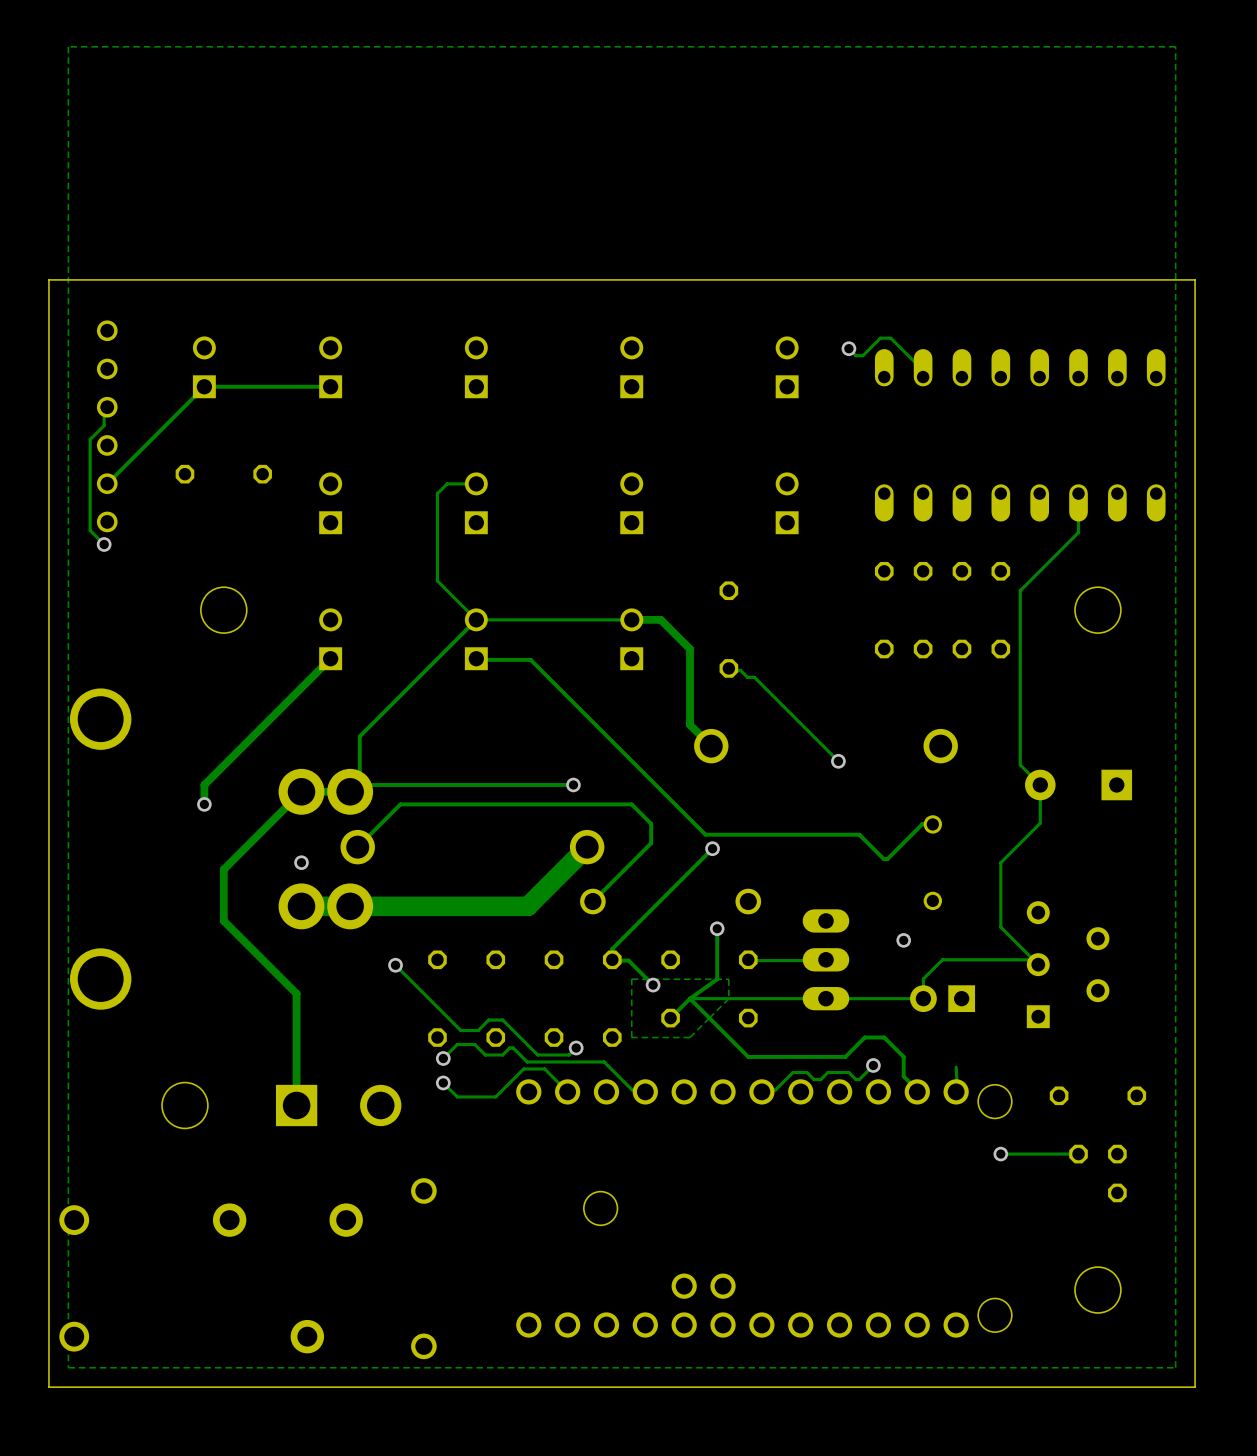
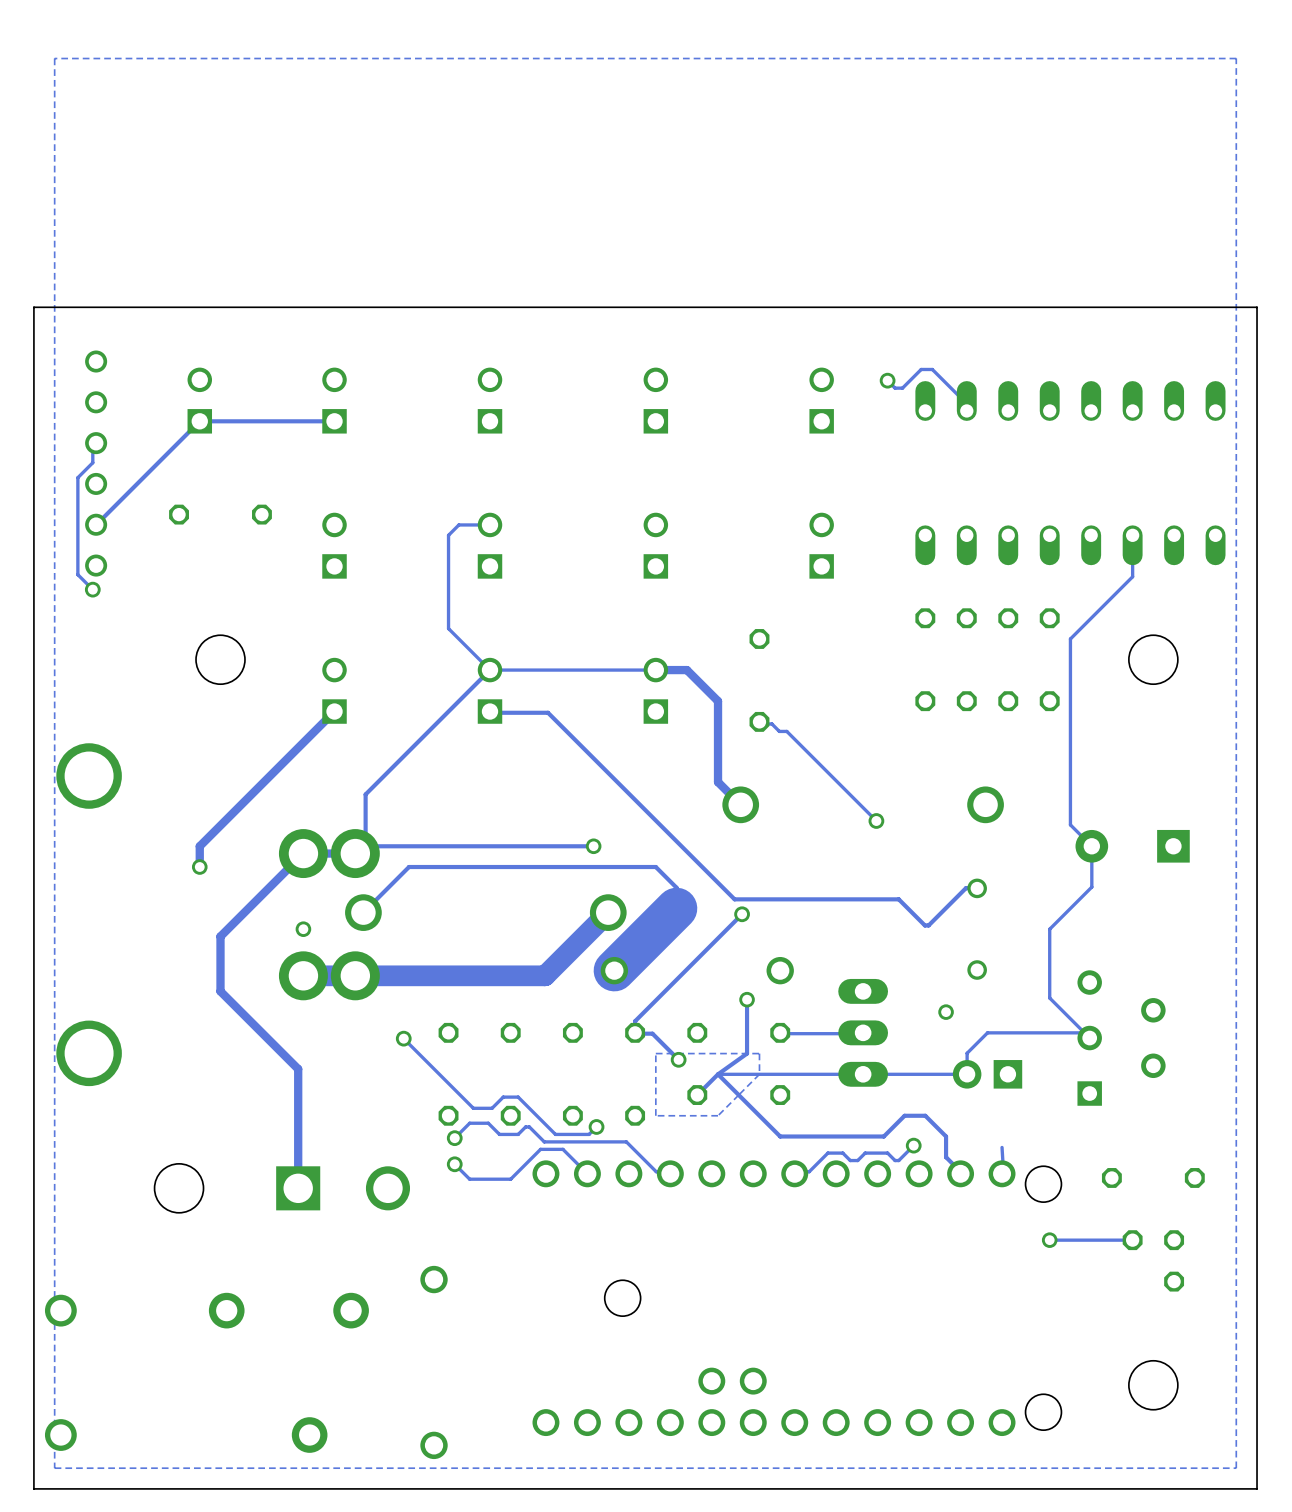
track width: thin (651, 843) (592, 901) -> thick (676, 908) (614, 970)

